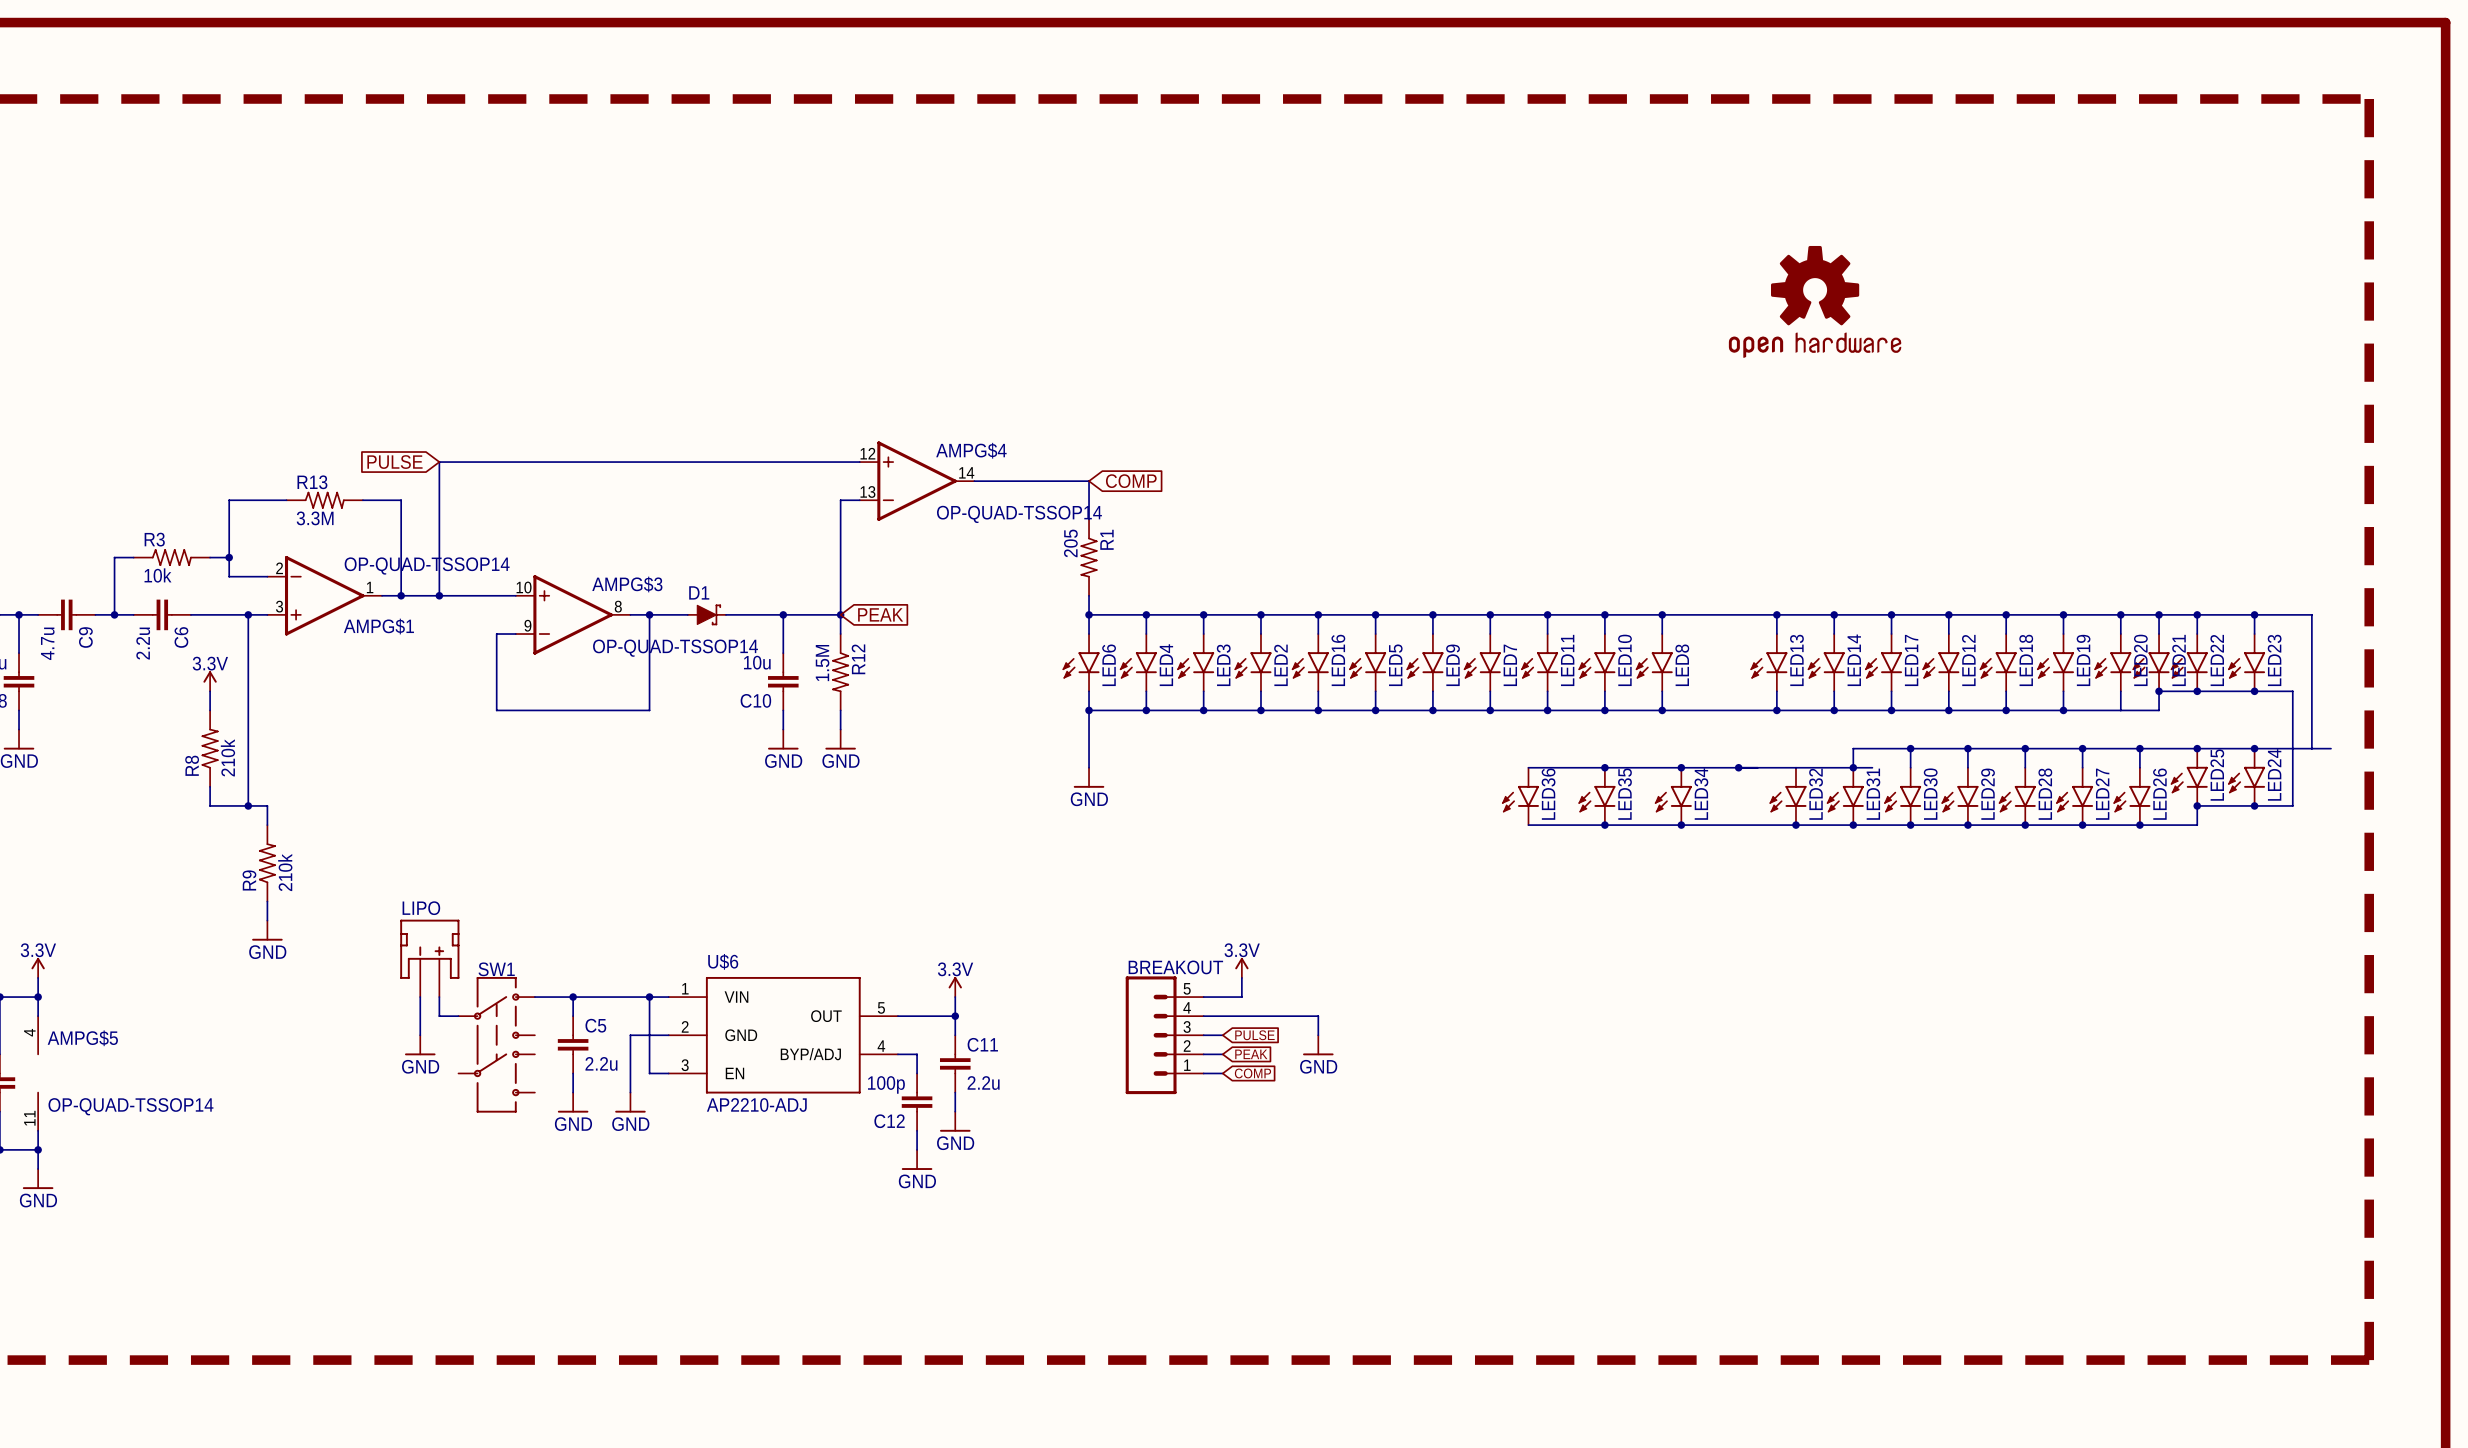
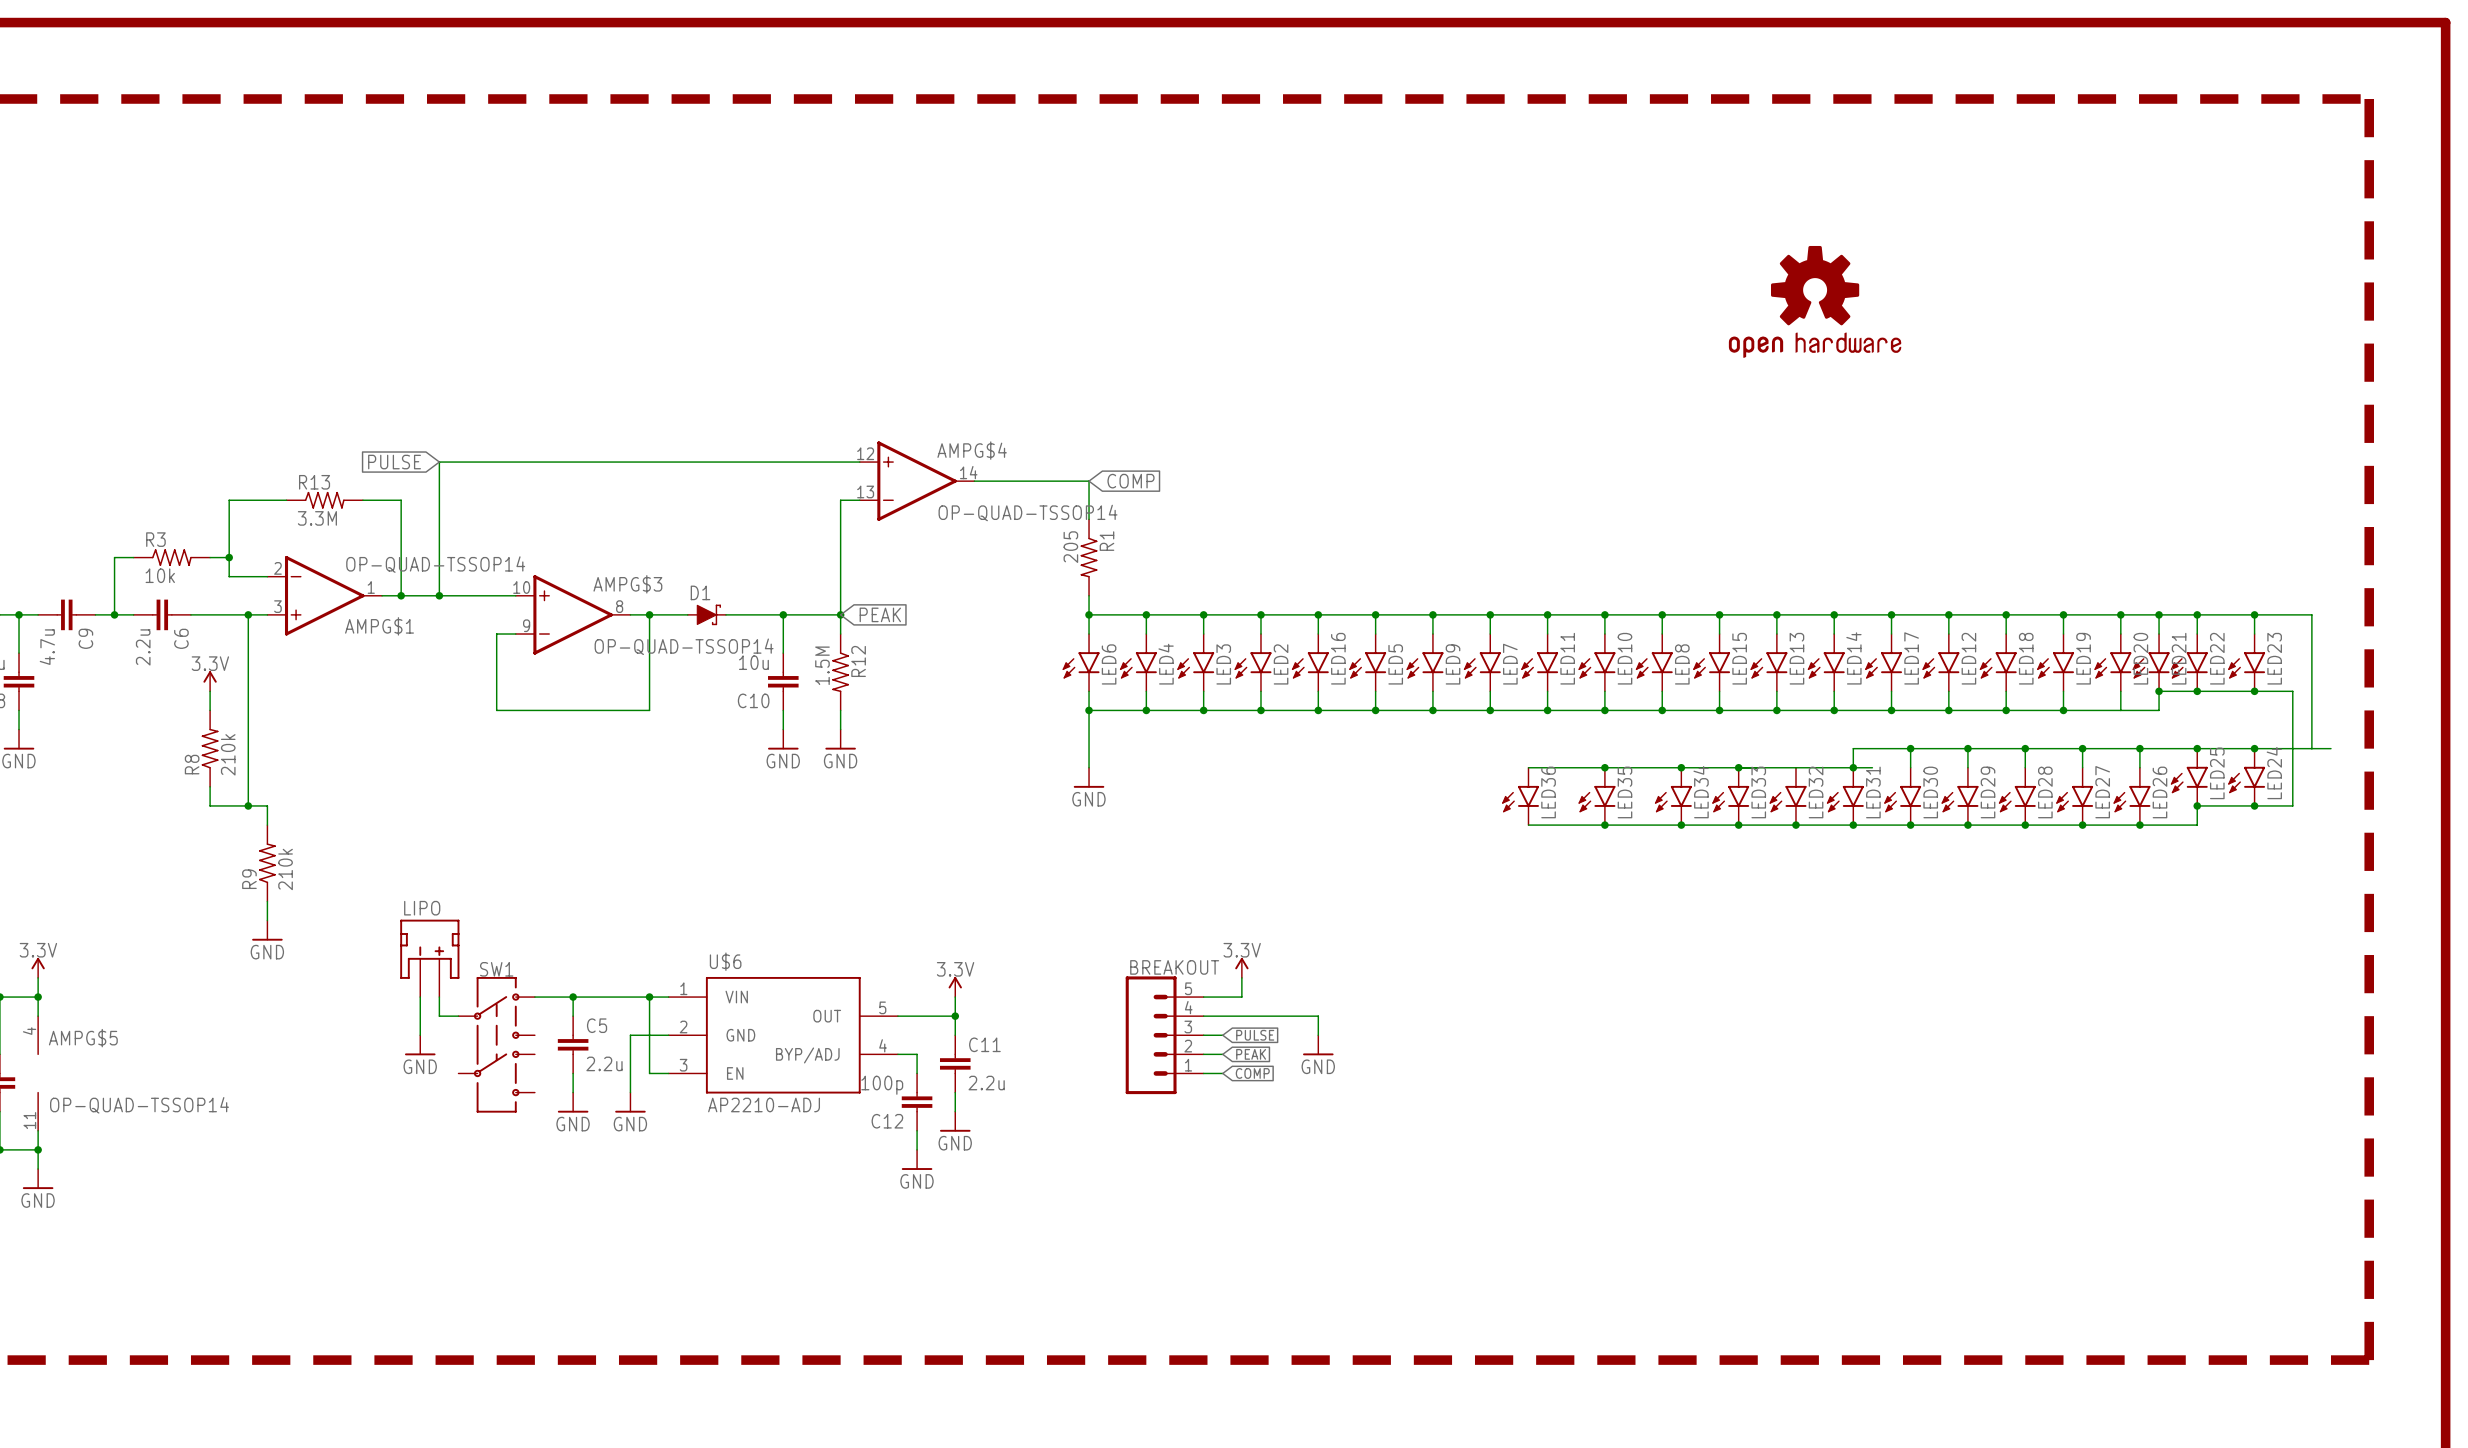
wire: none -> (1719, 614) (1719, 634)
junction: none -> (1719, 614)
LED15: none -> (1711, 662)
wire: none -> (1719, 691) (1719, 710)
junction: none -> (1719, 710)
LED33: none -> (1730, 796)
junction: none -> (1738, 825)

